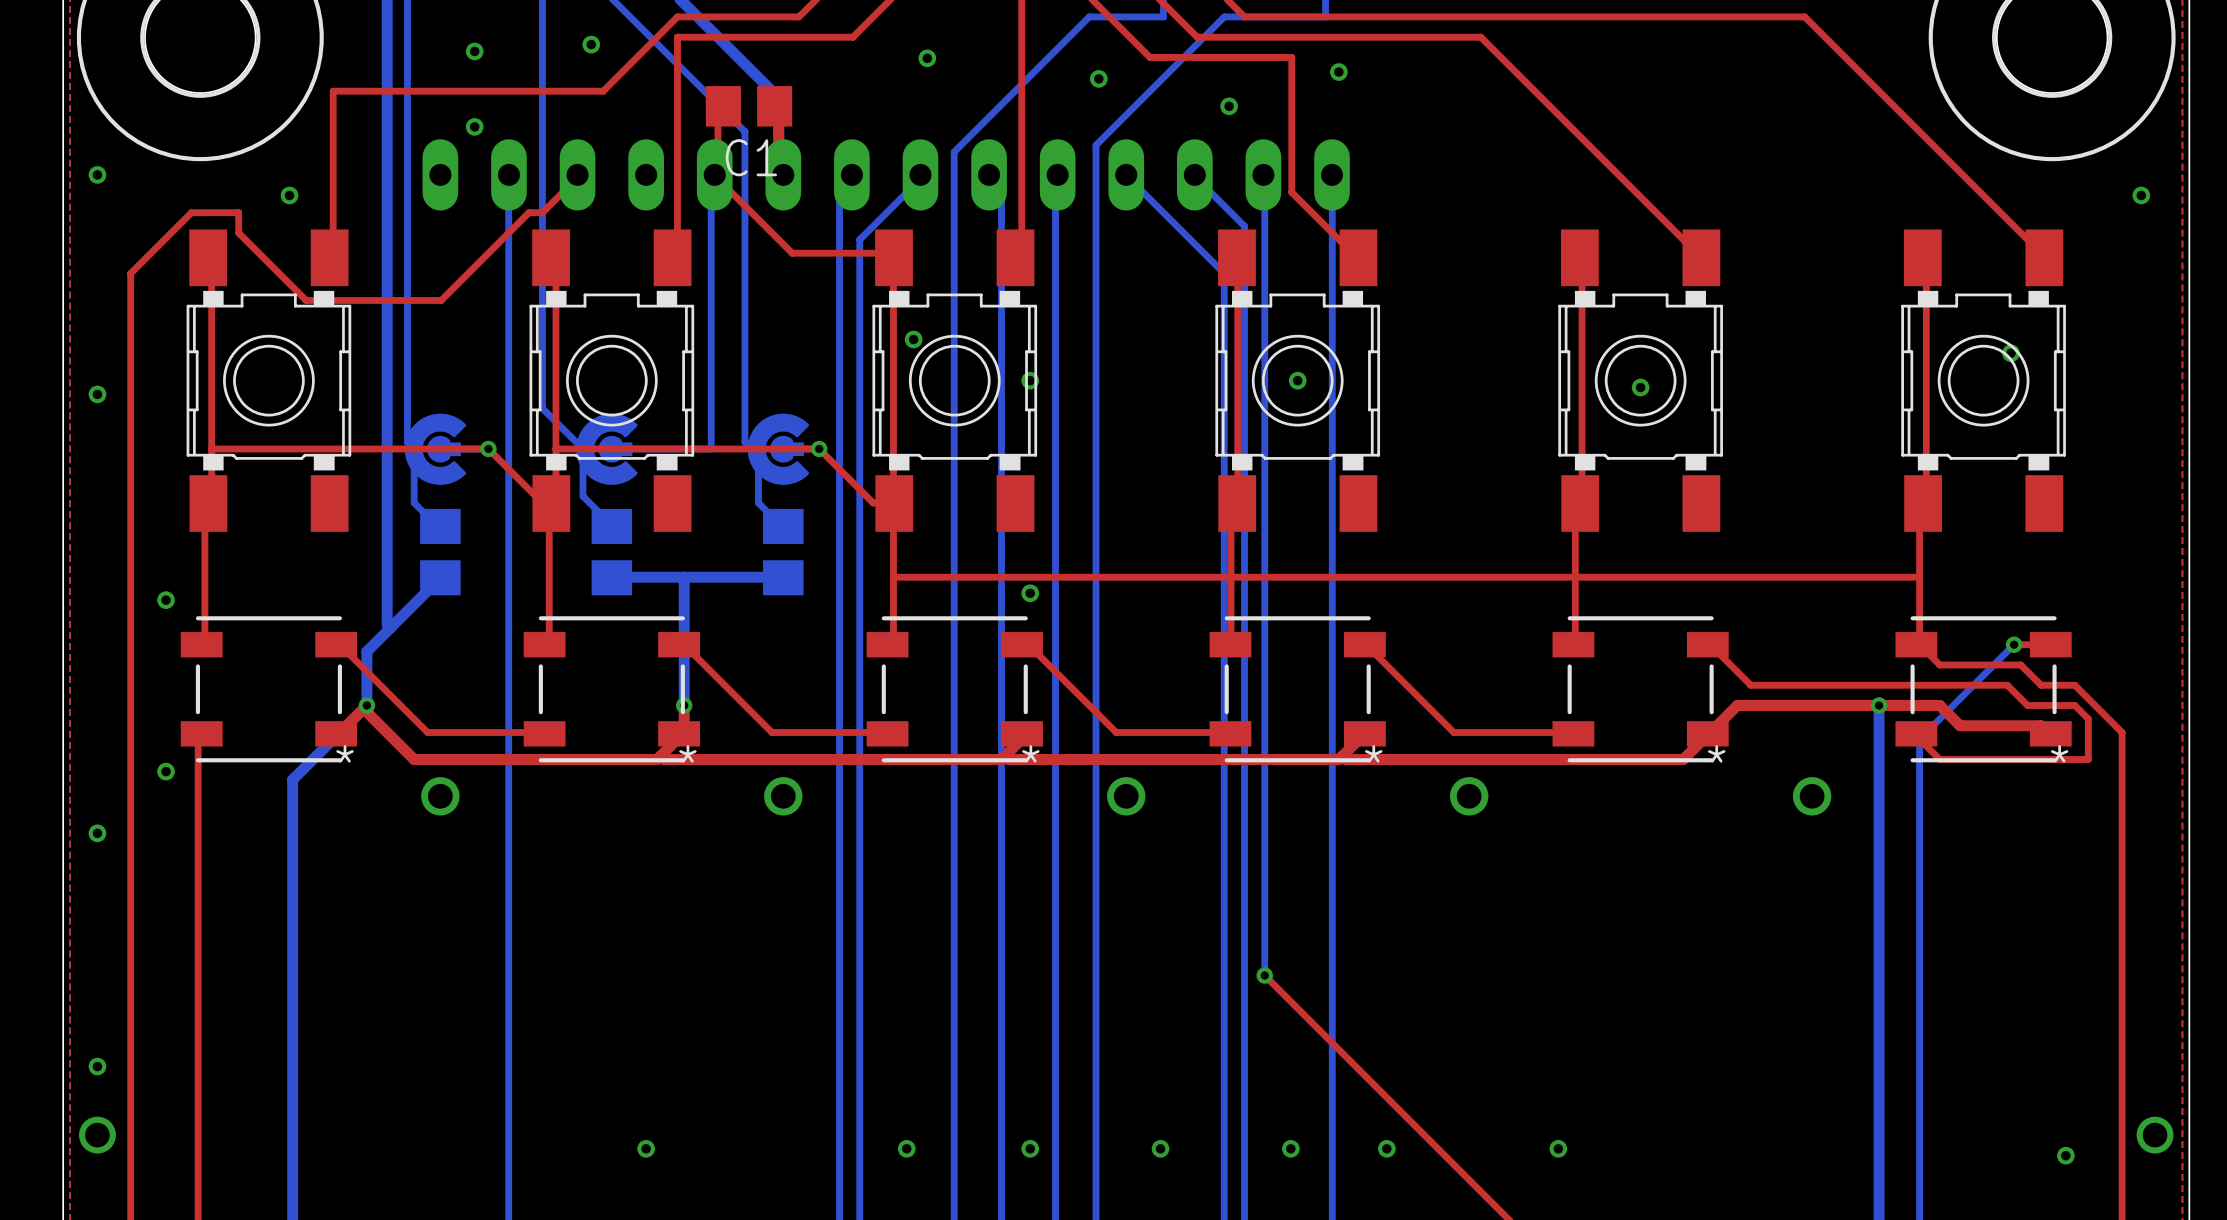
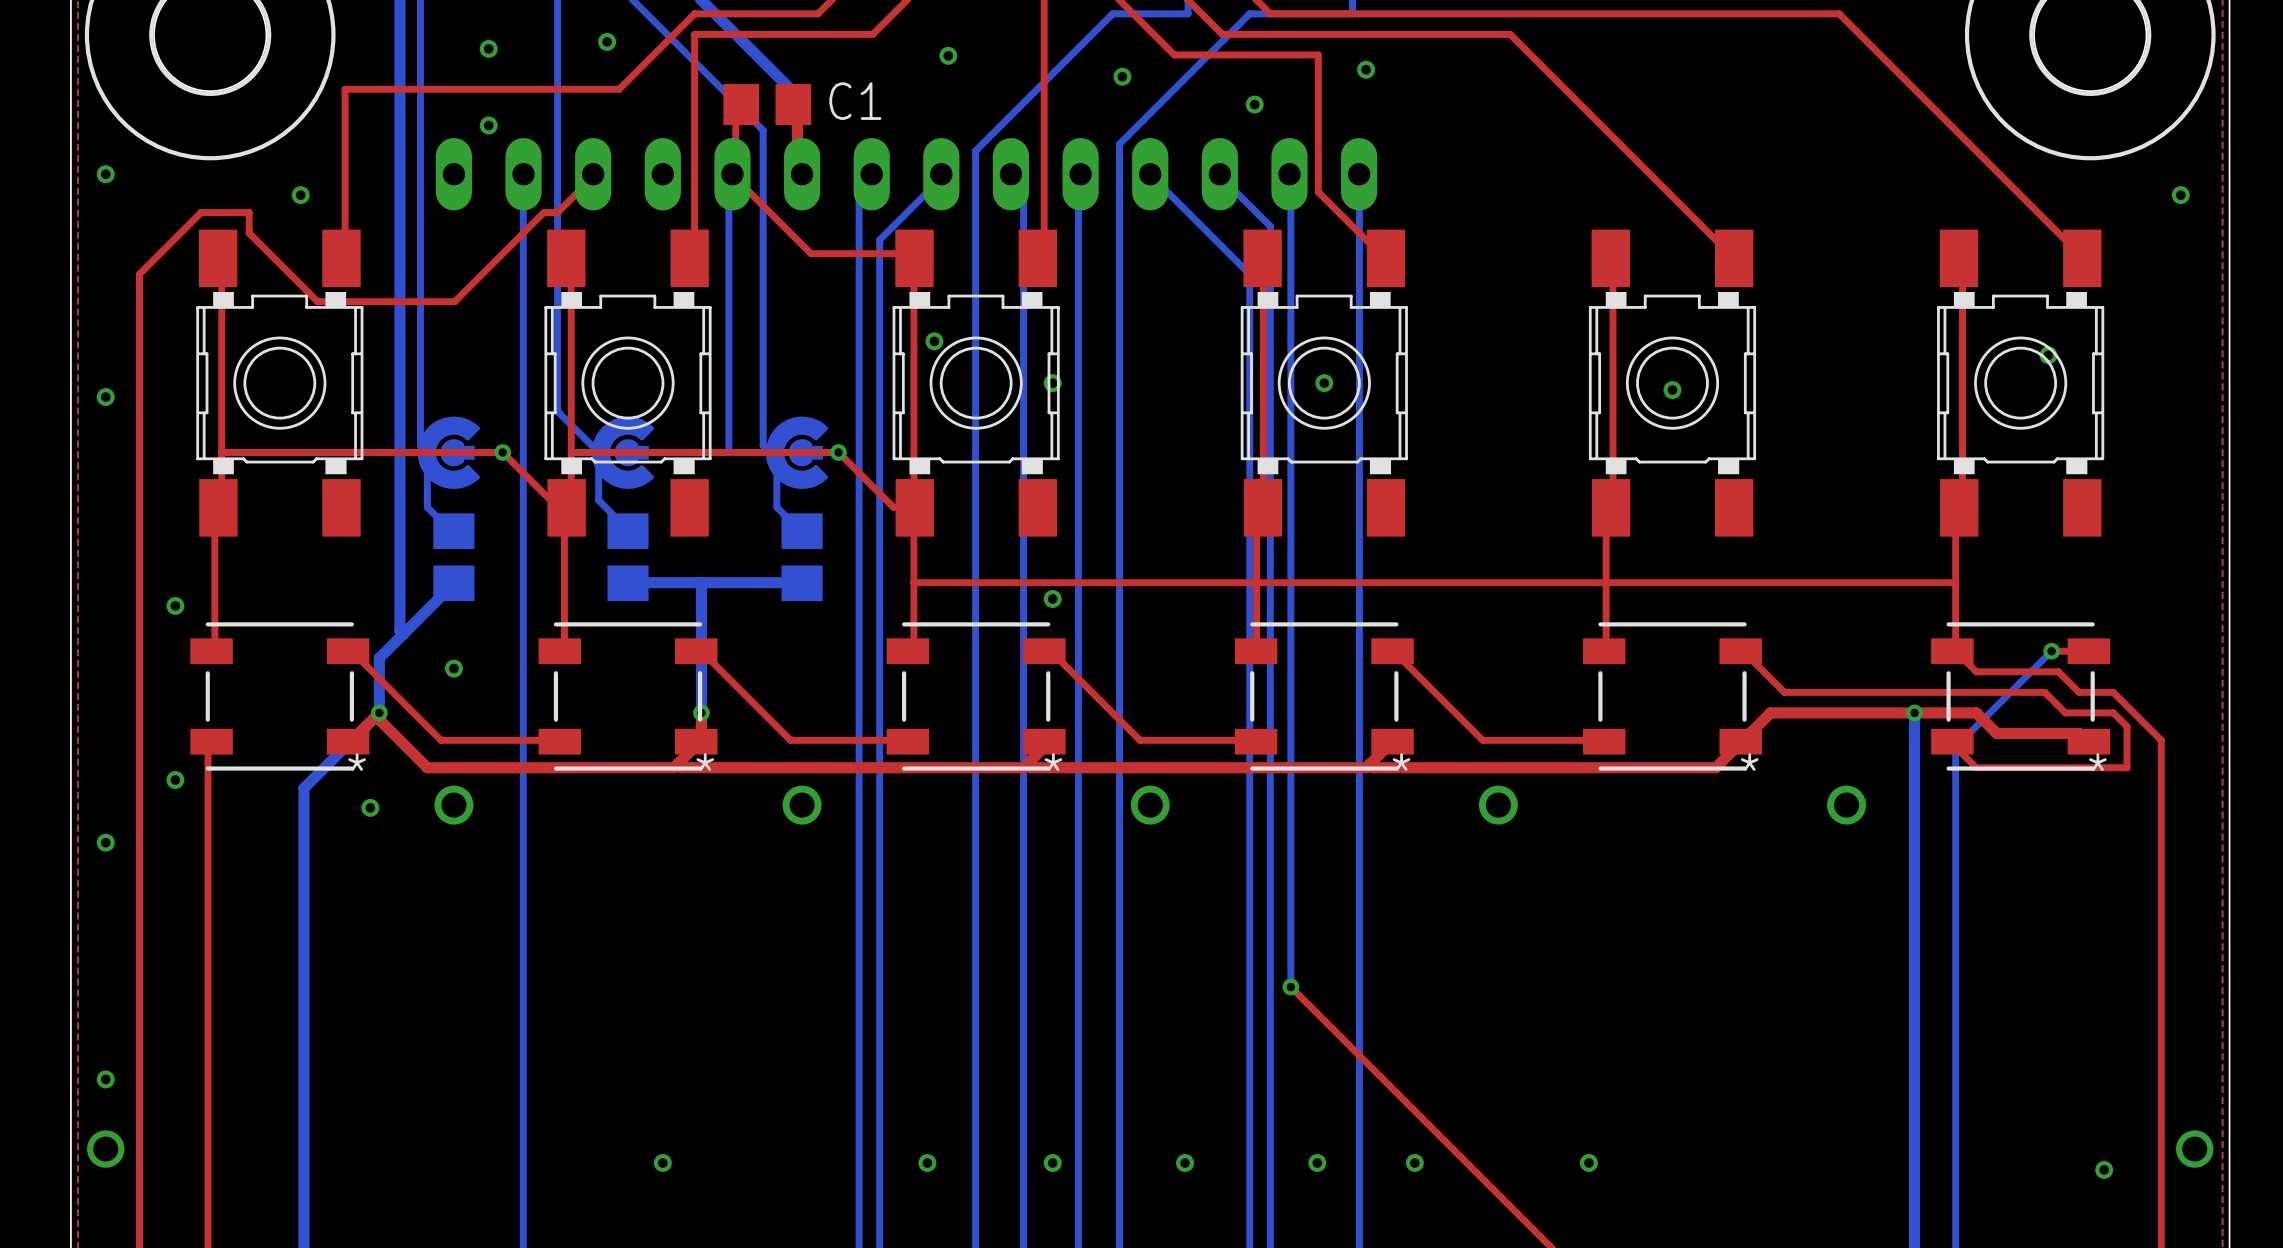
C1 name position: C1 (751, 157) -> C1 (855, 101)
via: none -> (453, 668)
via: none -> (370, 807)

